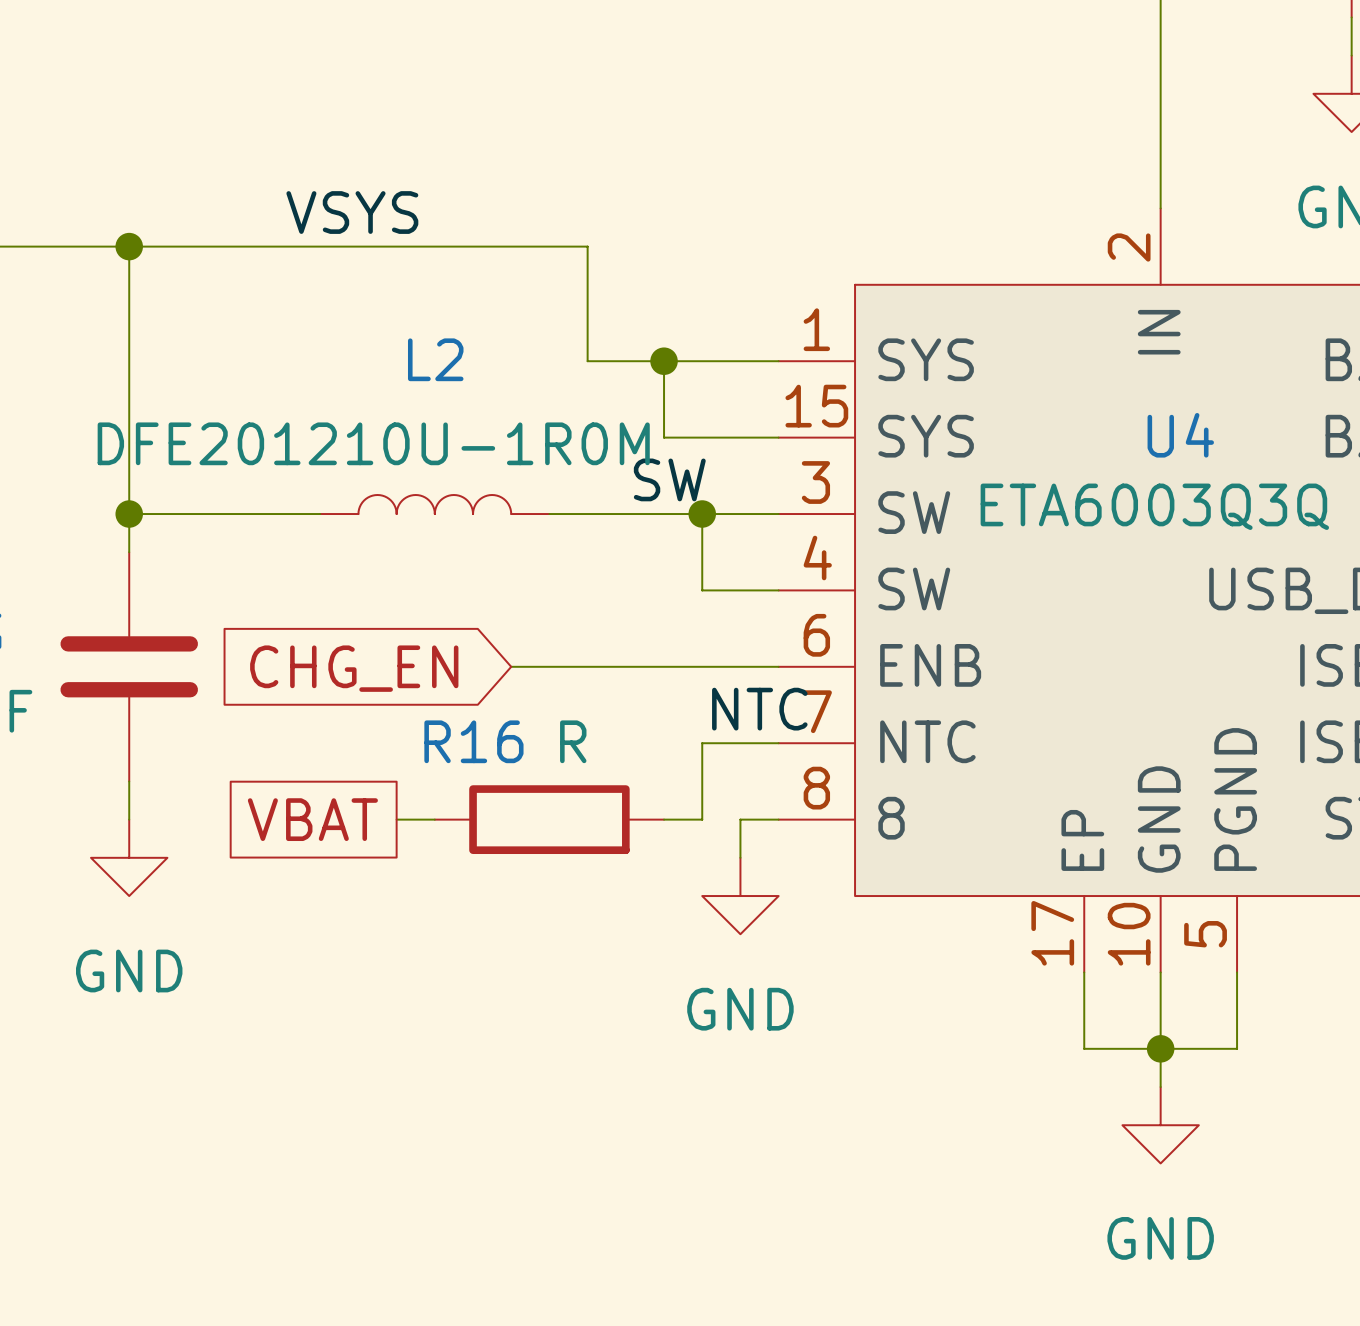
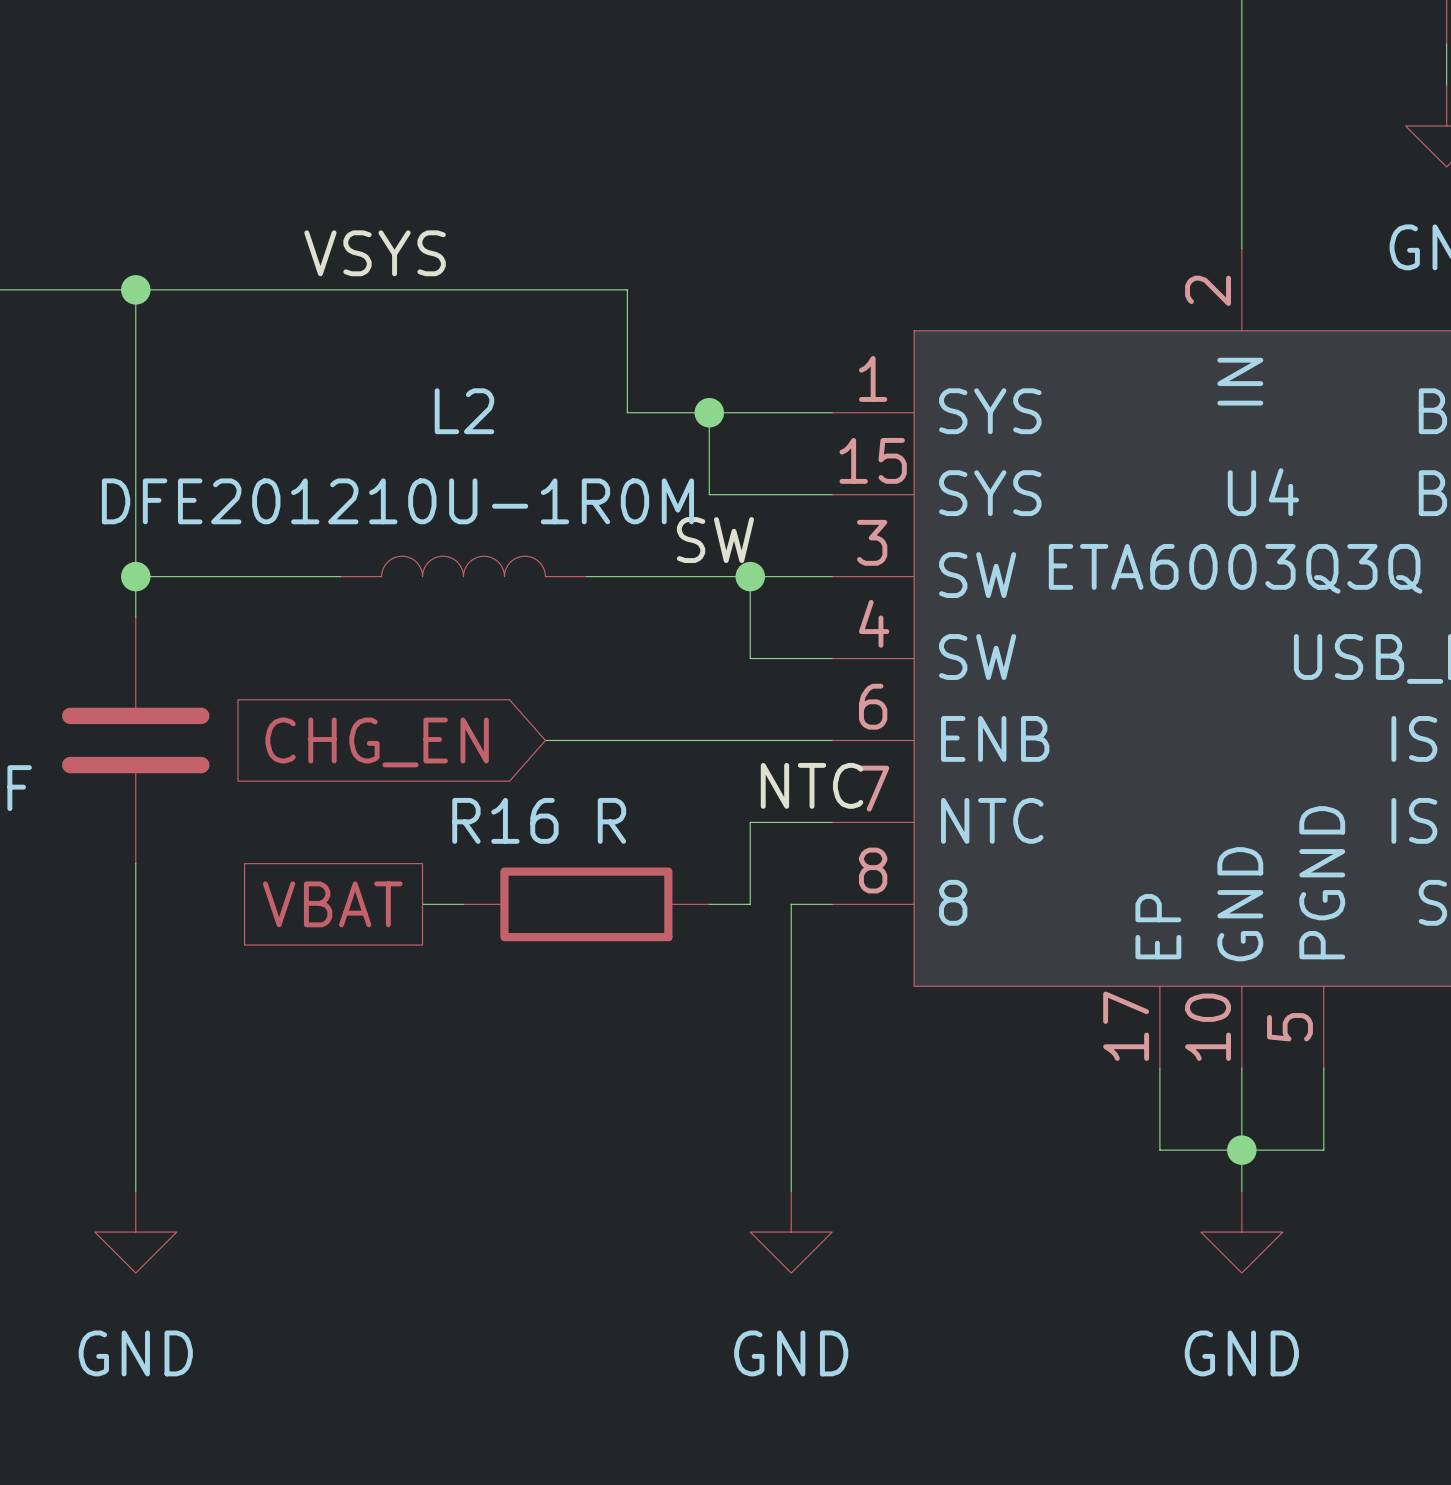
wire: none -> (135, 904) (135, 1191)
power symbol position: GND (129, 857) -> GND (135, 1232)
wire: none -> (791, 945) (791, 1191)
power symbol position: GND (740, 896) -> GND (791, 1232)

